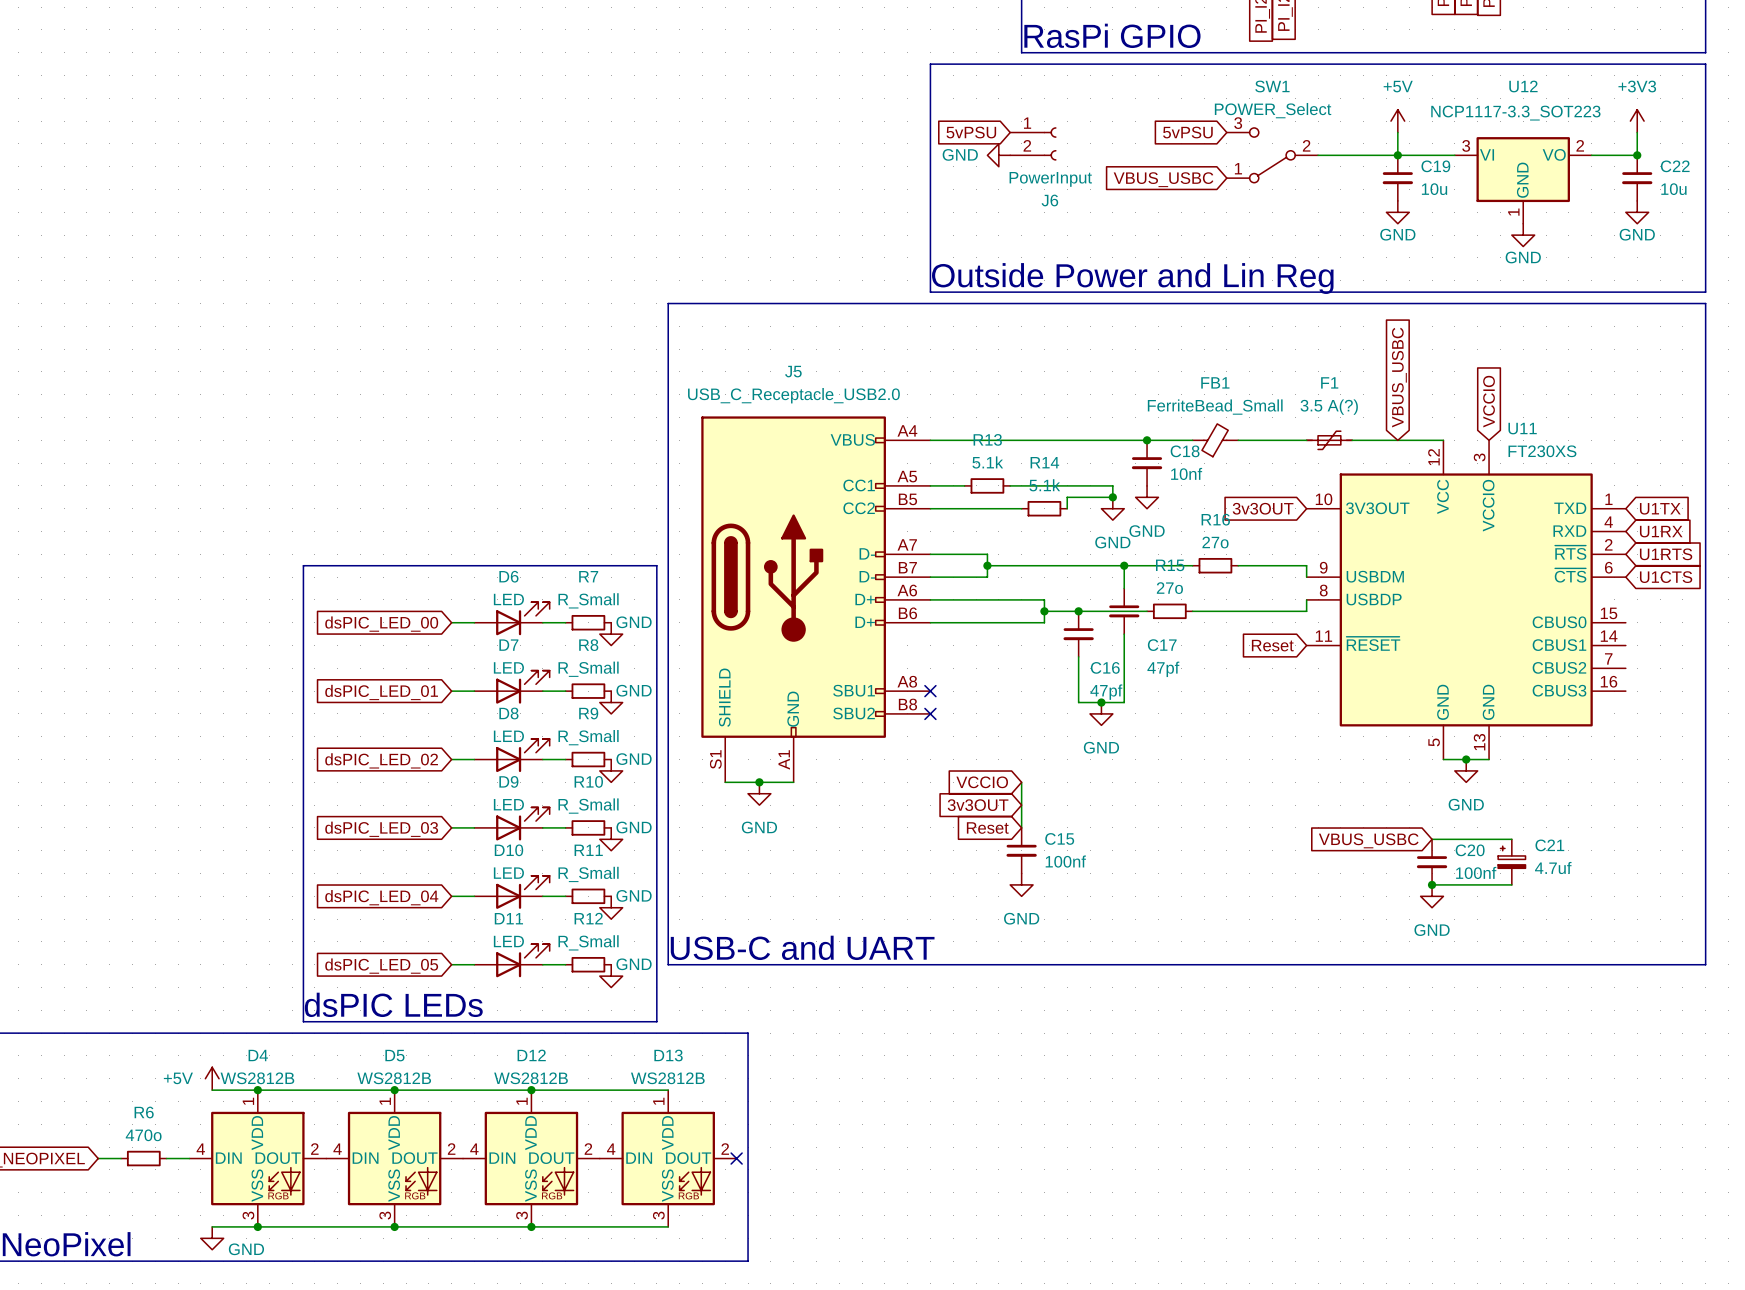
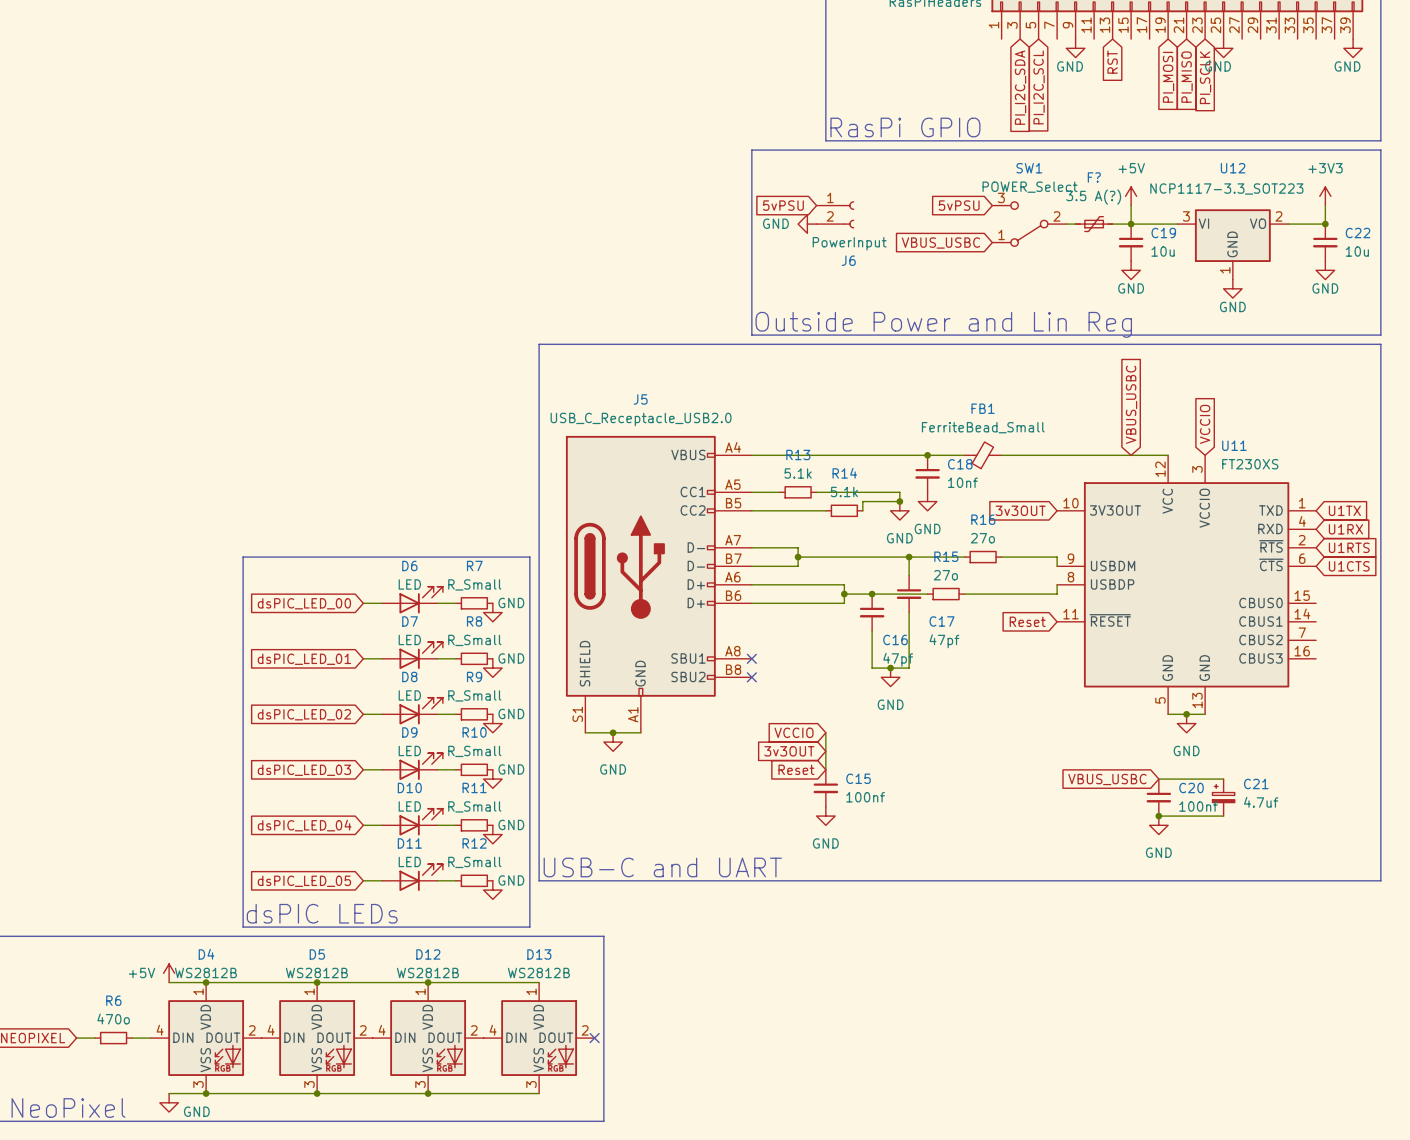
F?: none -> 3.5 A(?) (1094, 224)
F1: 3.5 A(?) (1329, 440) -> none

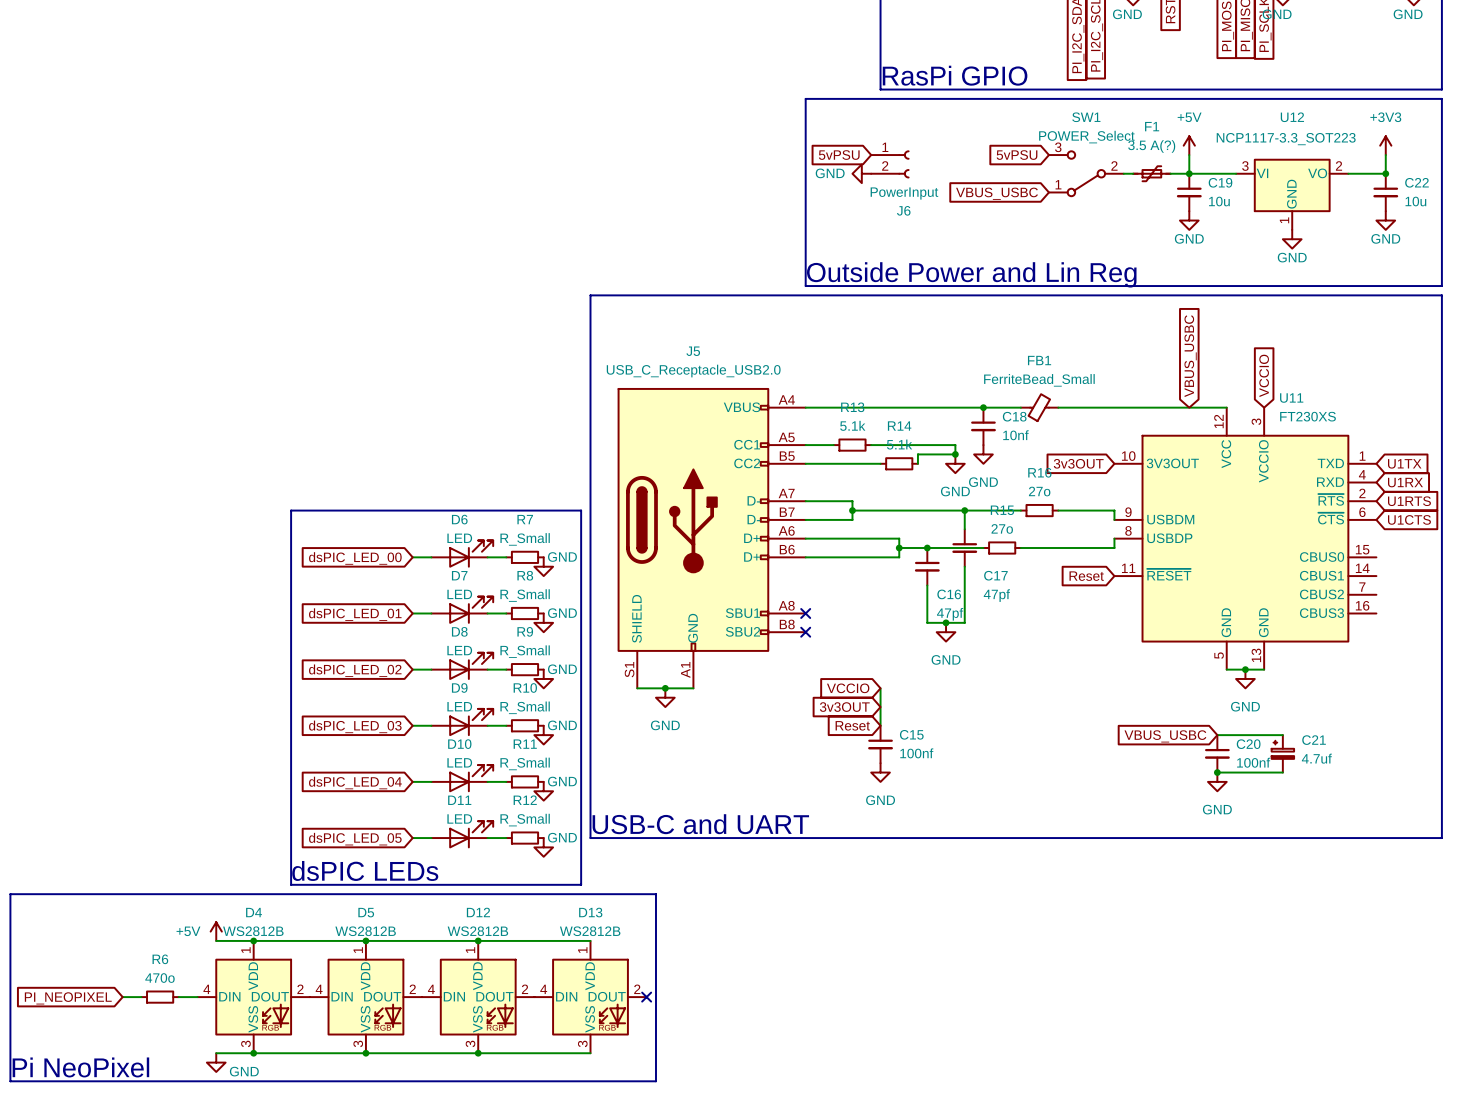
F? name: F? (1094, 177) -> F1 (1152, 126)

